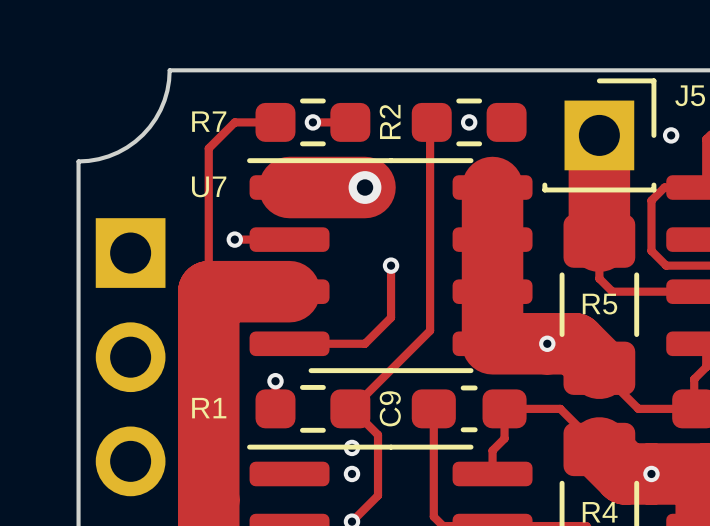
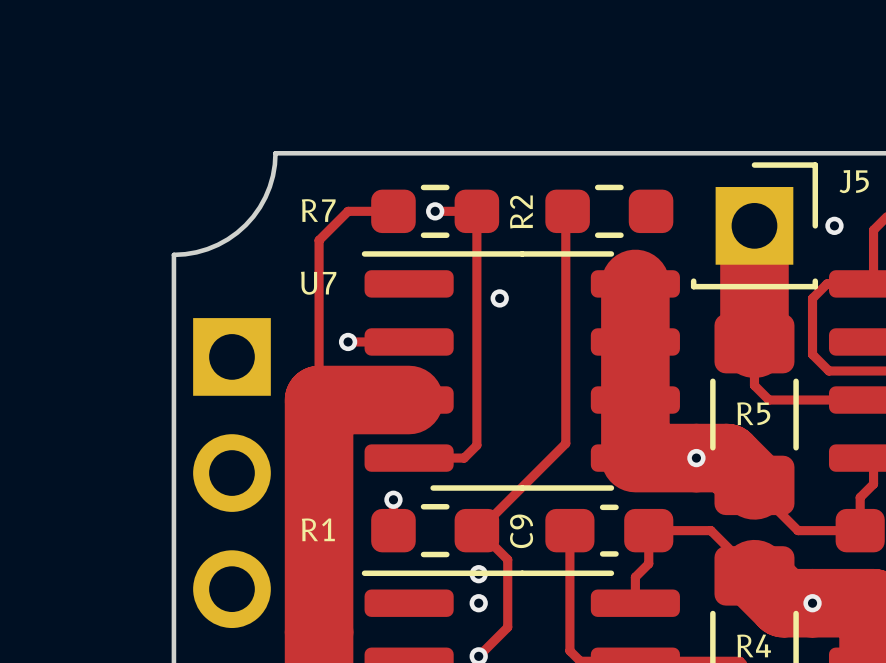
via: (469, 122) -> none
via size: [348, 171, 382, 204] -> [490, 289, 509, 308]
track: (289, 187) (365, 187) -> none
track: (391, 265) (391, 317) (365, 343) (338, 343) -> (476, 211) (476, 445) (464, 458)
via: (391, 265) -> none

